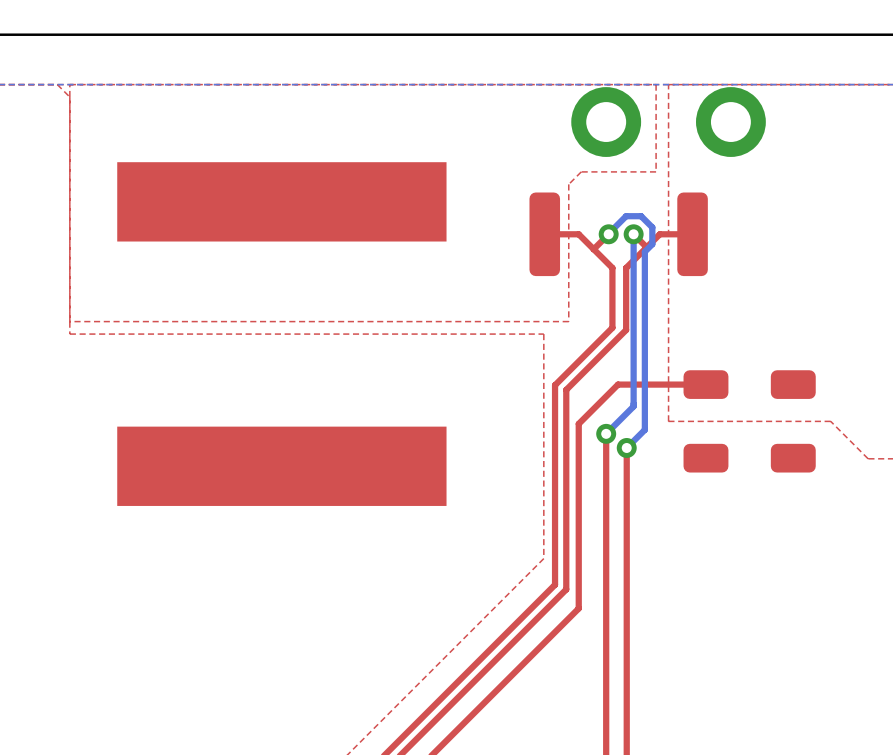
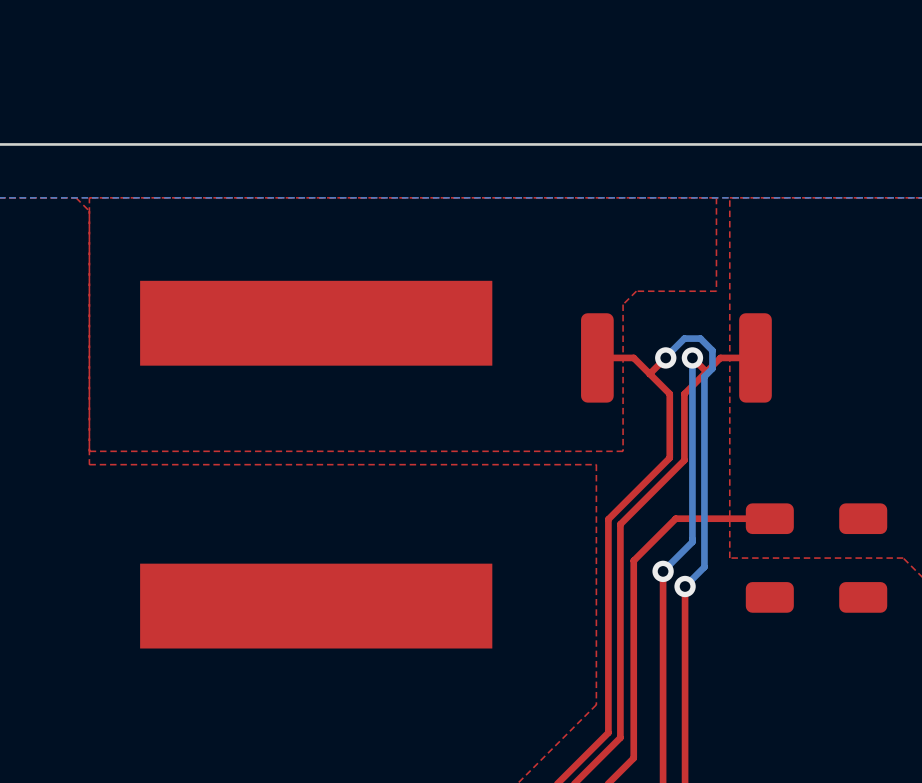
part: (606, 122) -> none
part: (730, 122) -> none

